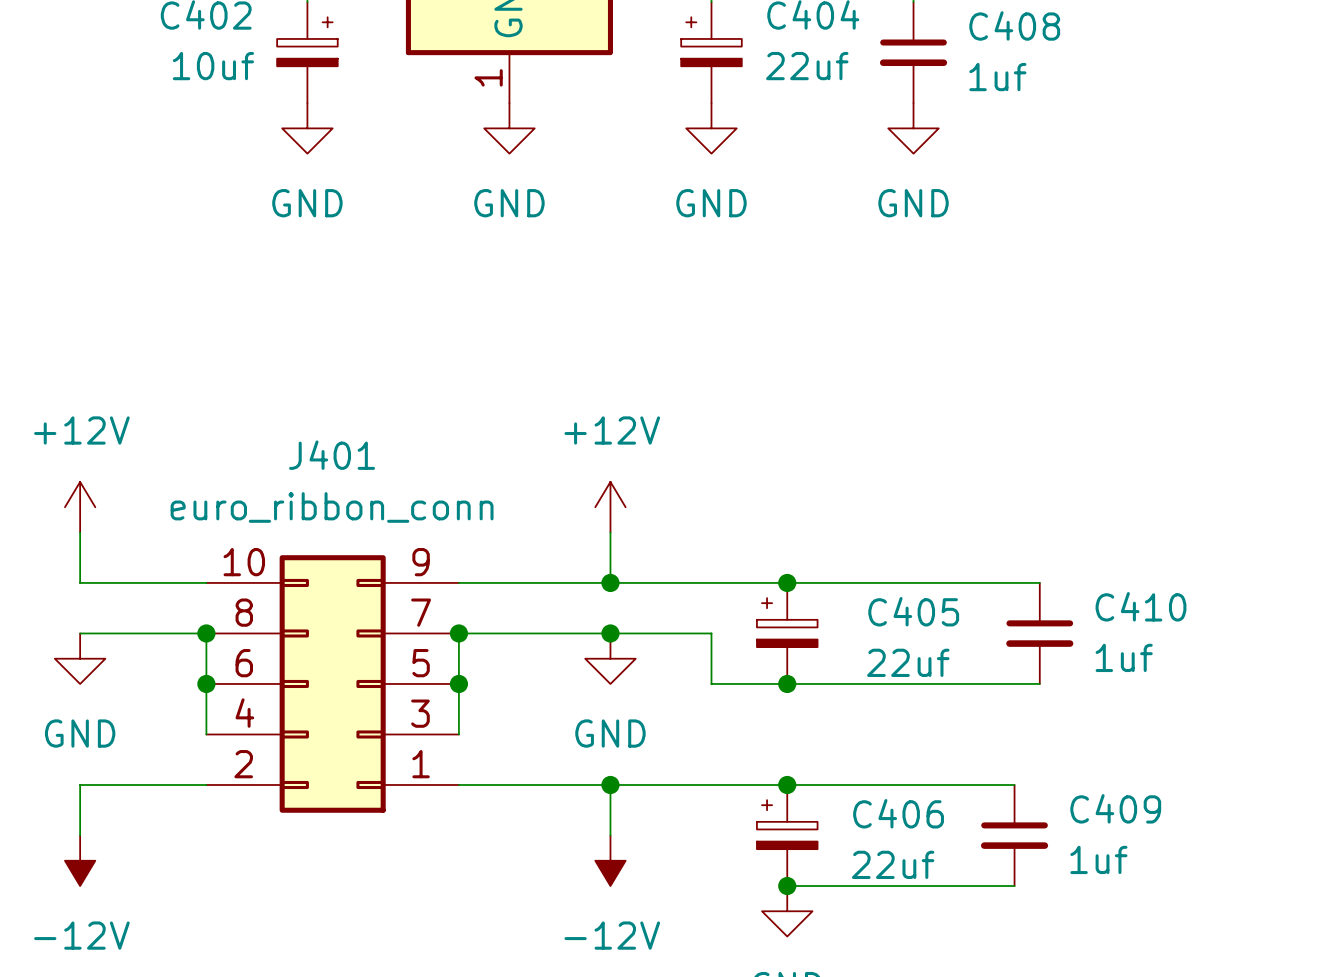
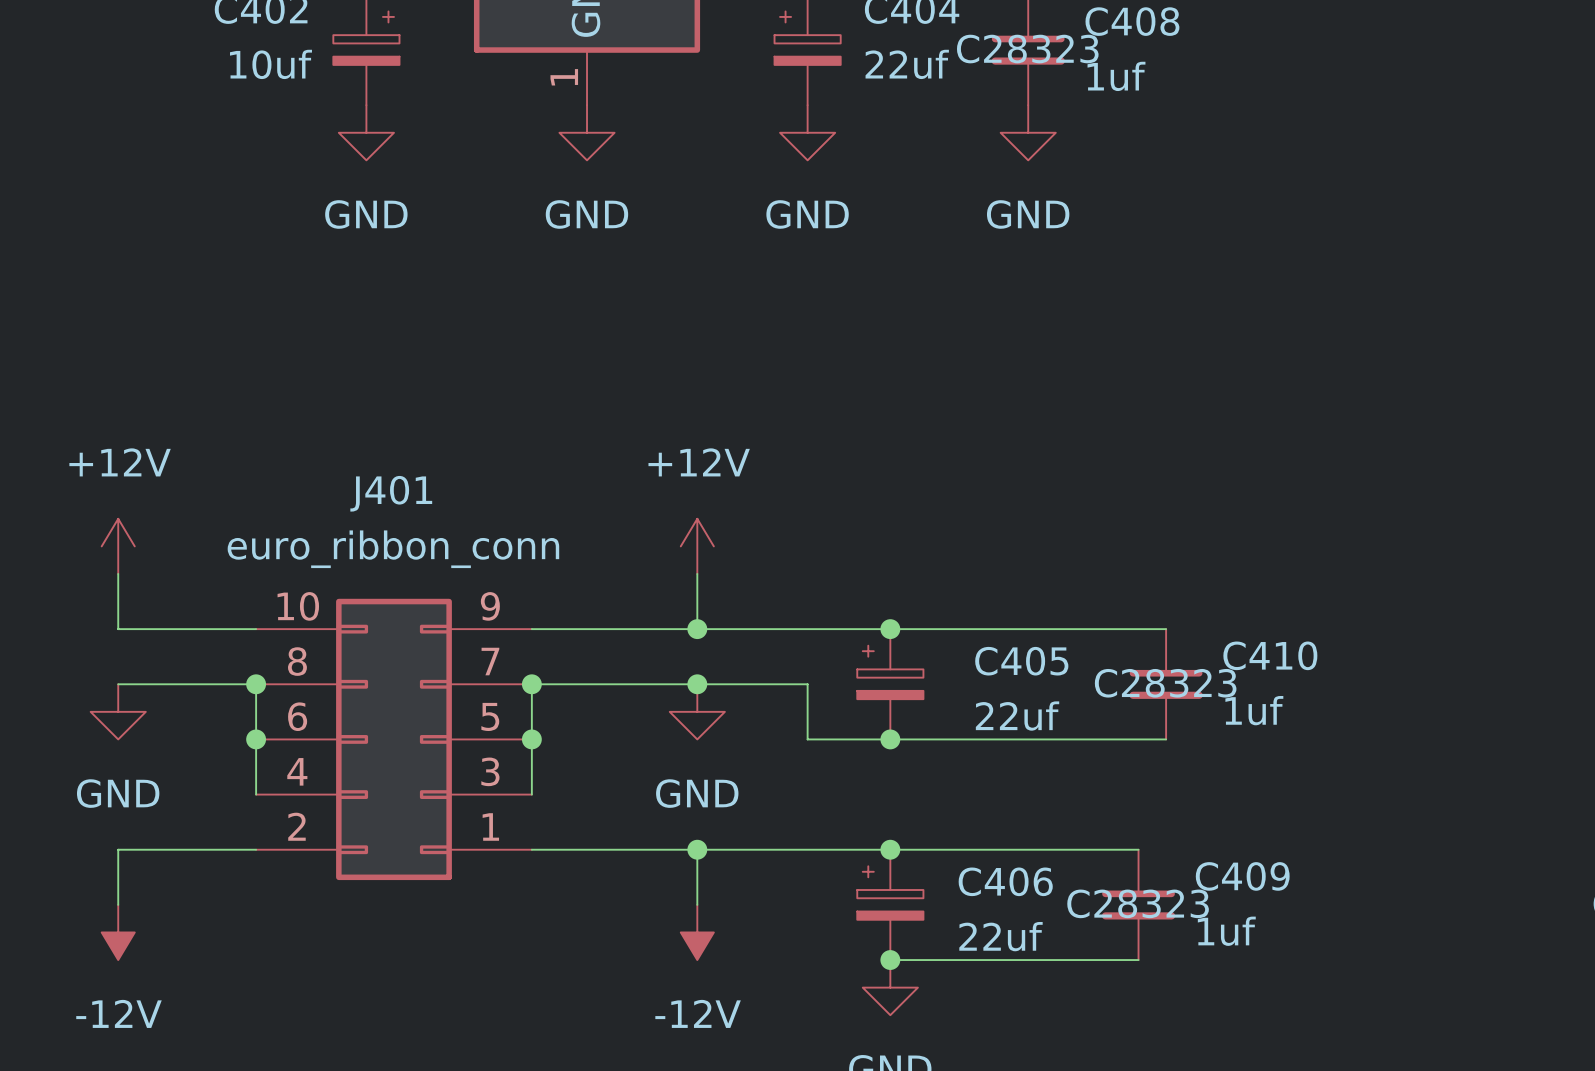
C408 text: none -> C28323 (1027, 49)
C410 text: none -> C28323 (1165, 683)
C409 text: none -> C28323 (1138, 903)

